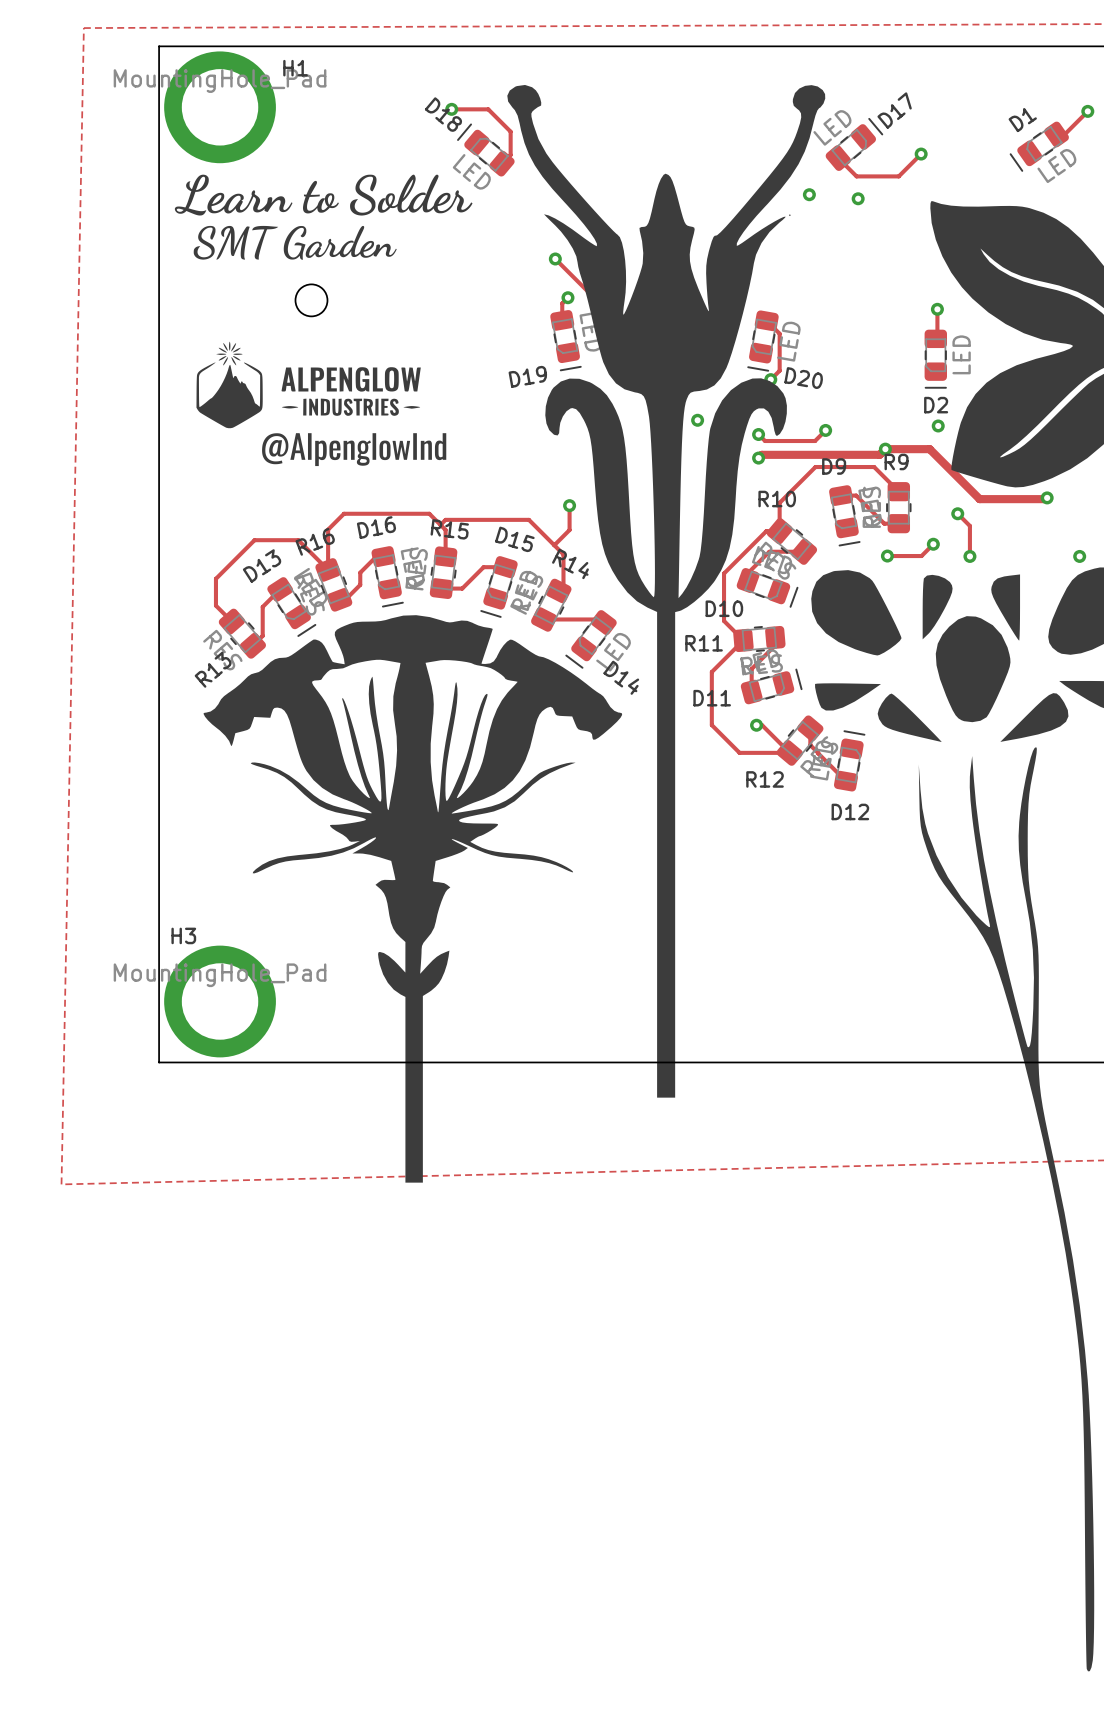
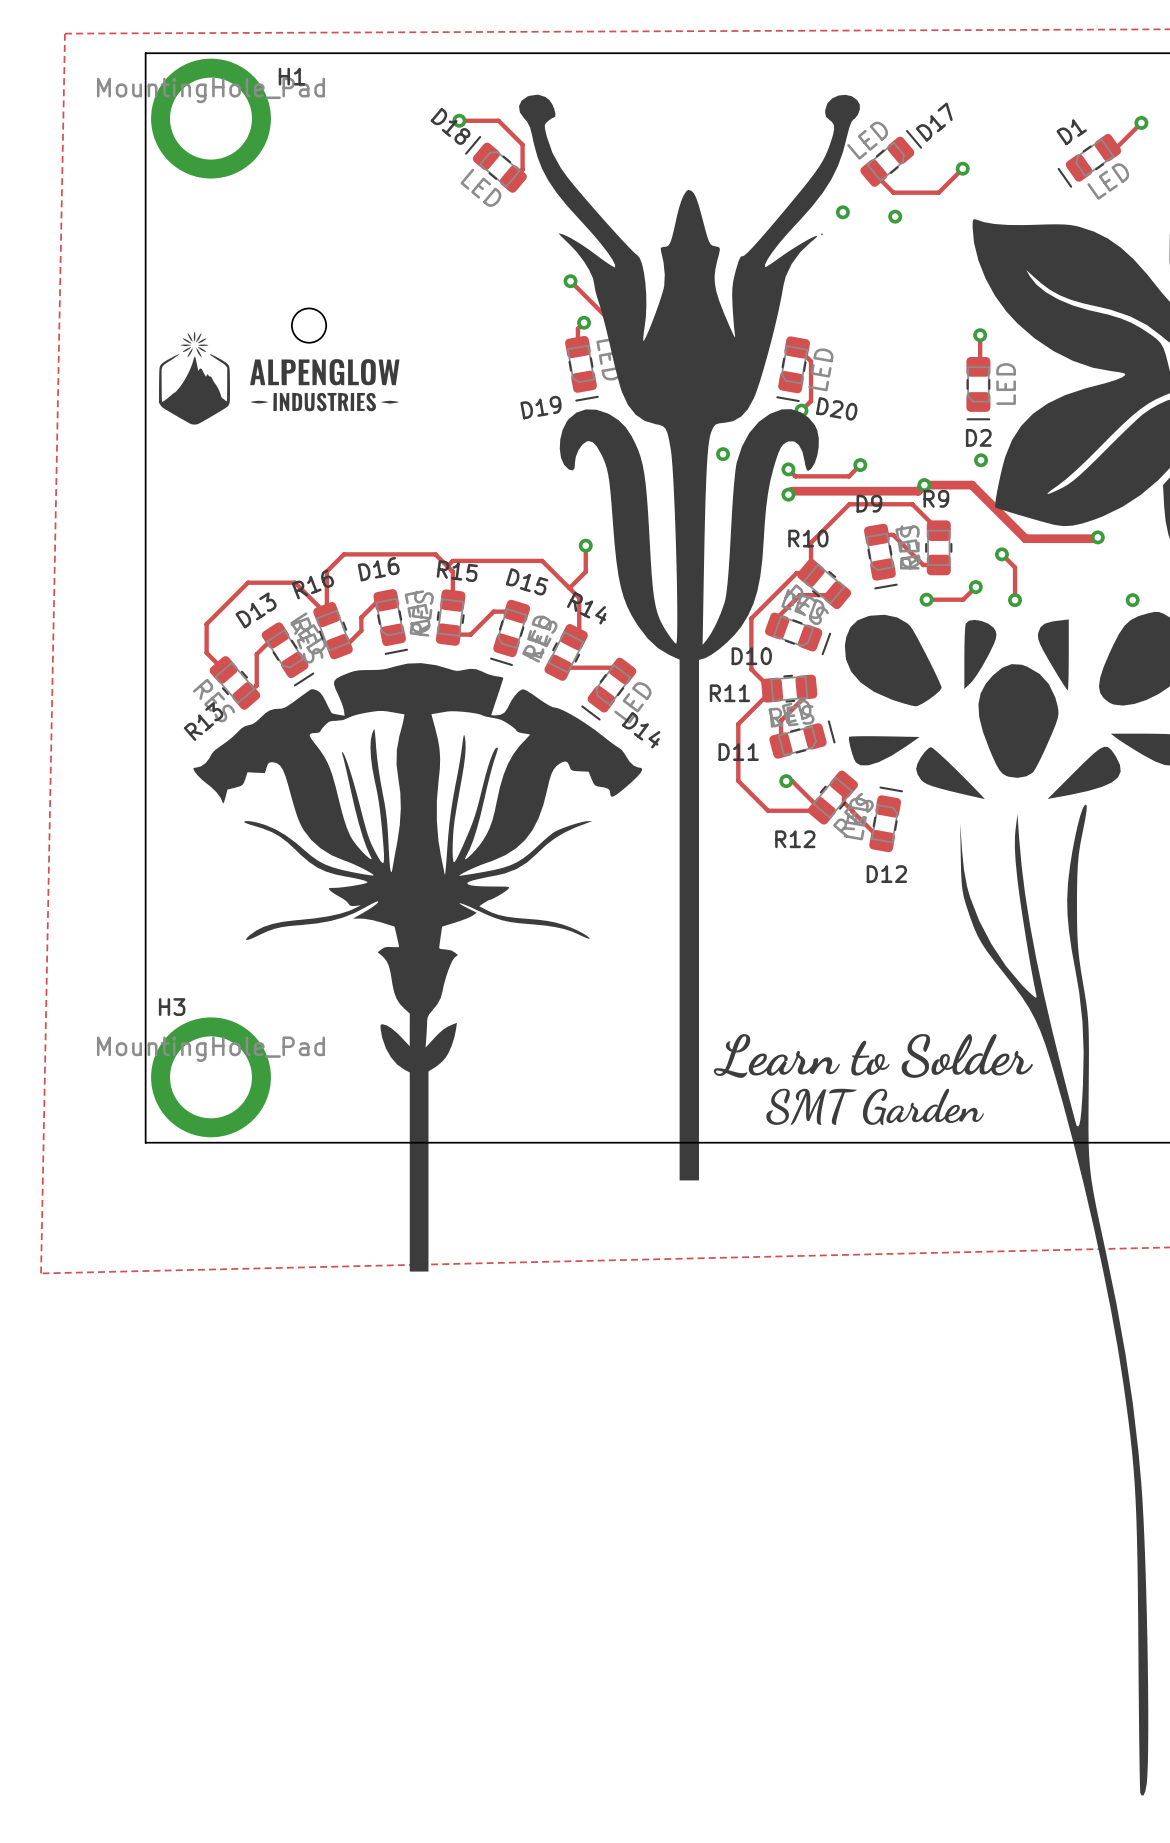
drawing: [174, 174, 473, 260] -> none
drawing position: (308, 384) -> (279, 378)
drawing: [262, 433, 447, 467] -> none
drawing: none -> [713, 1034, 1033, 1126]

